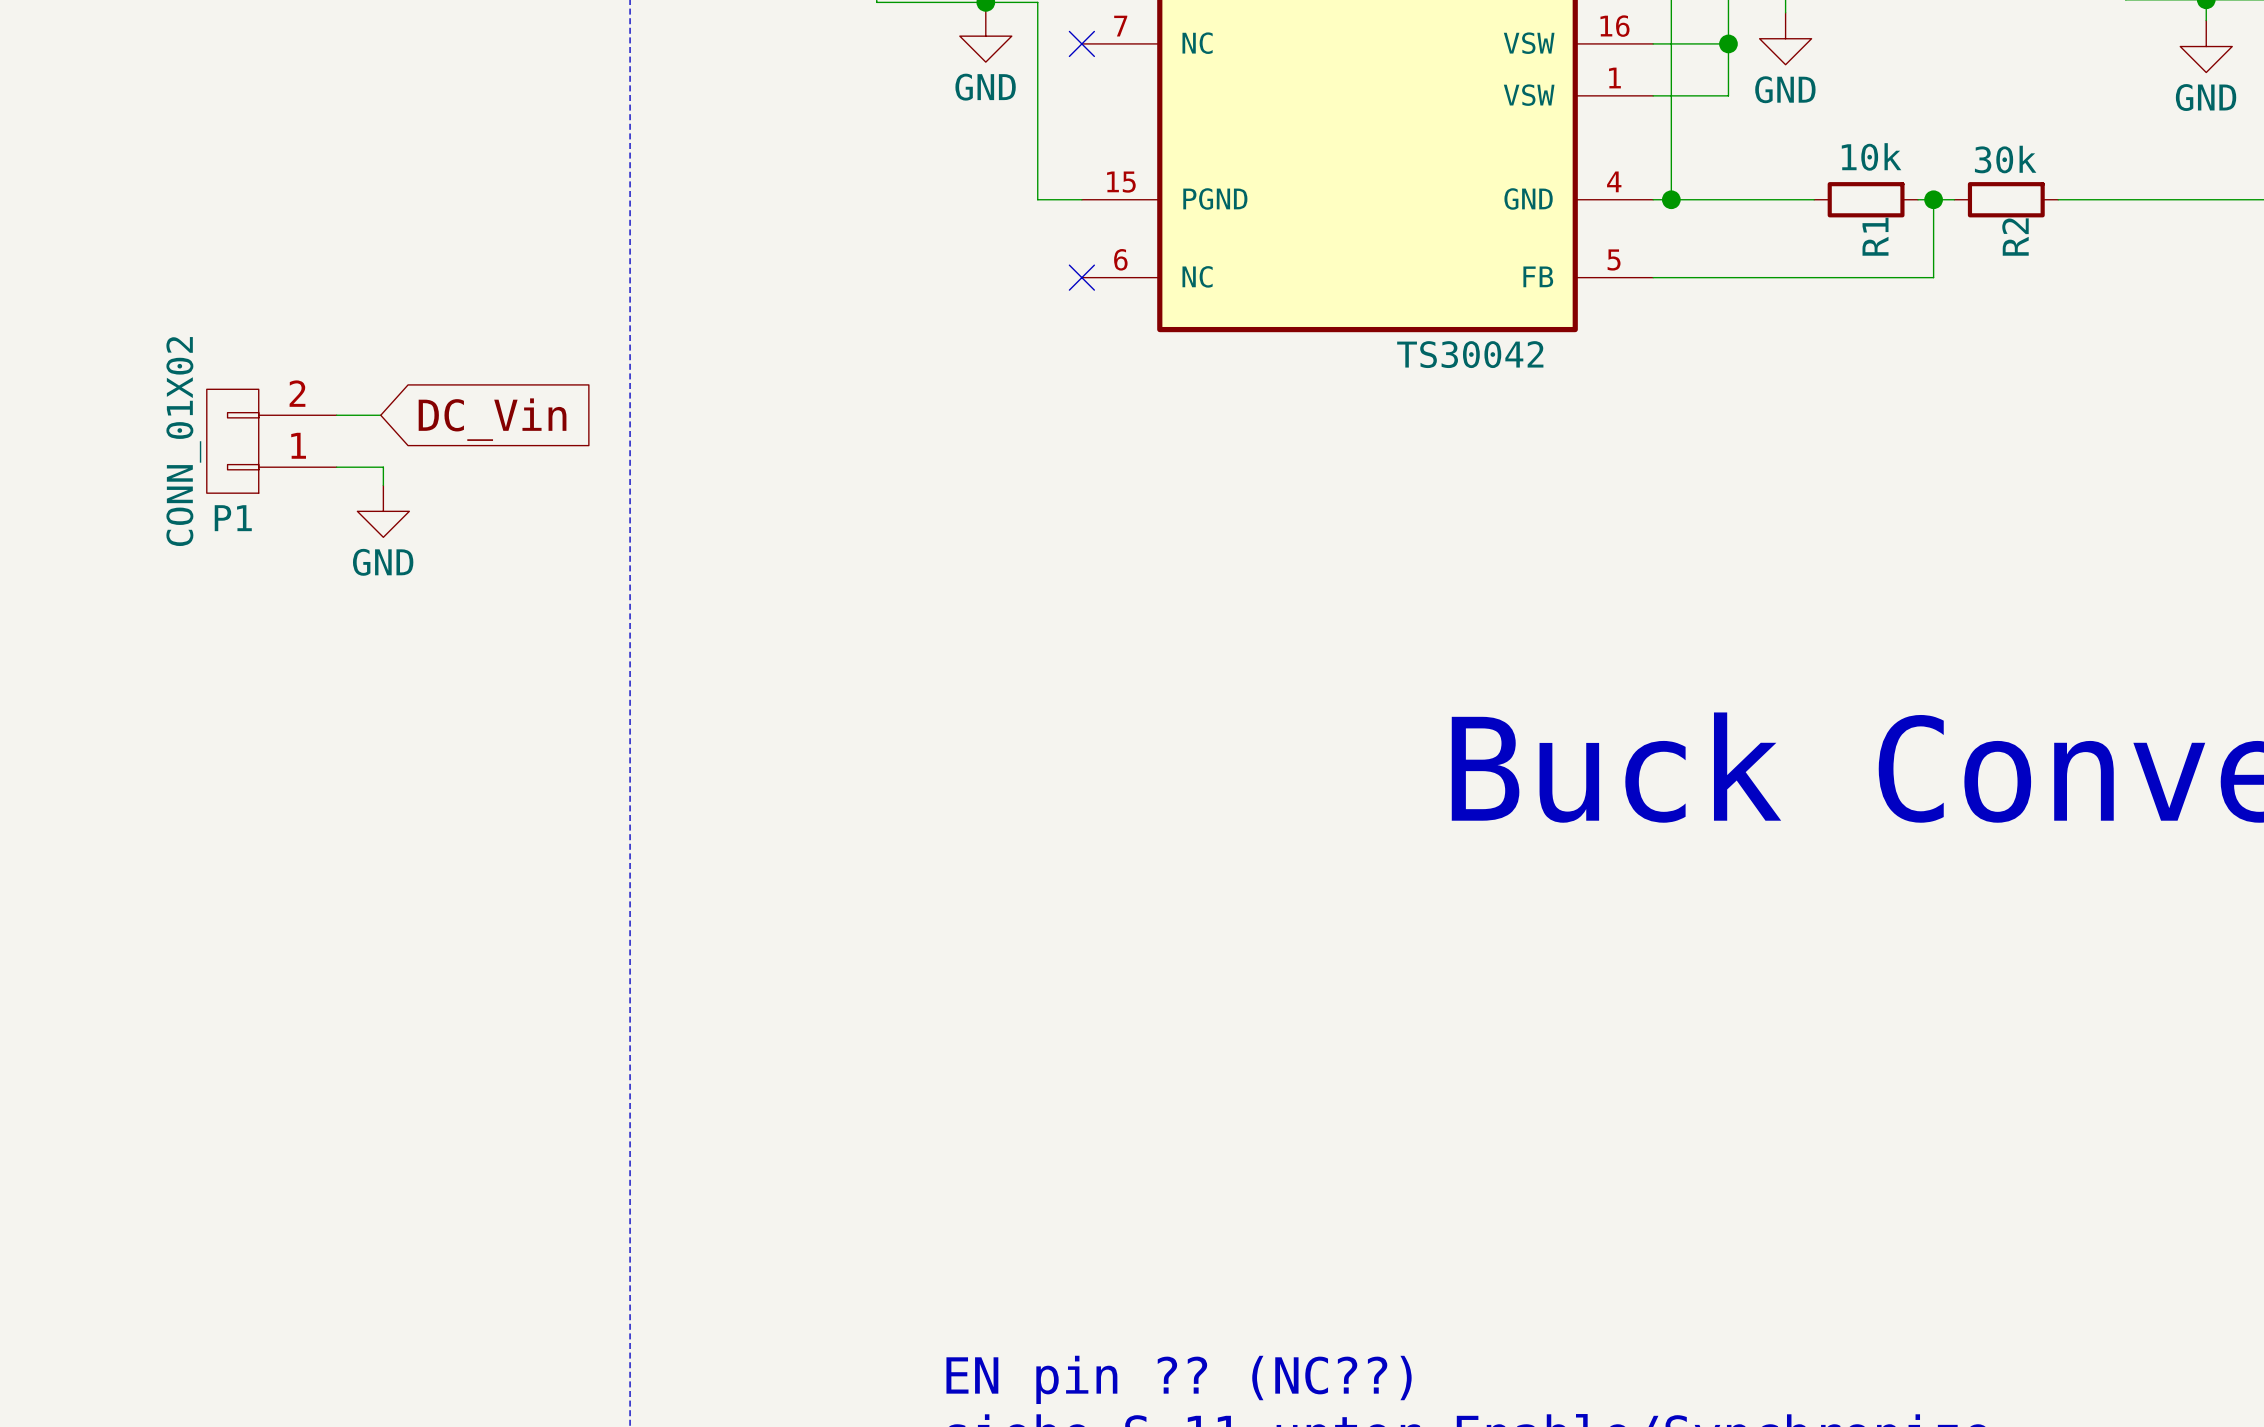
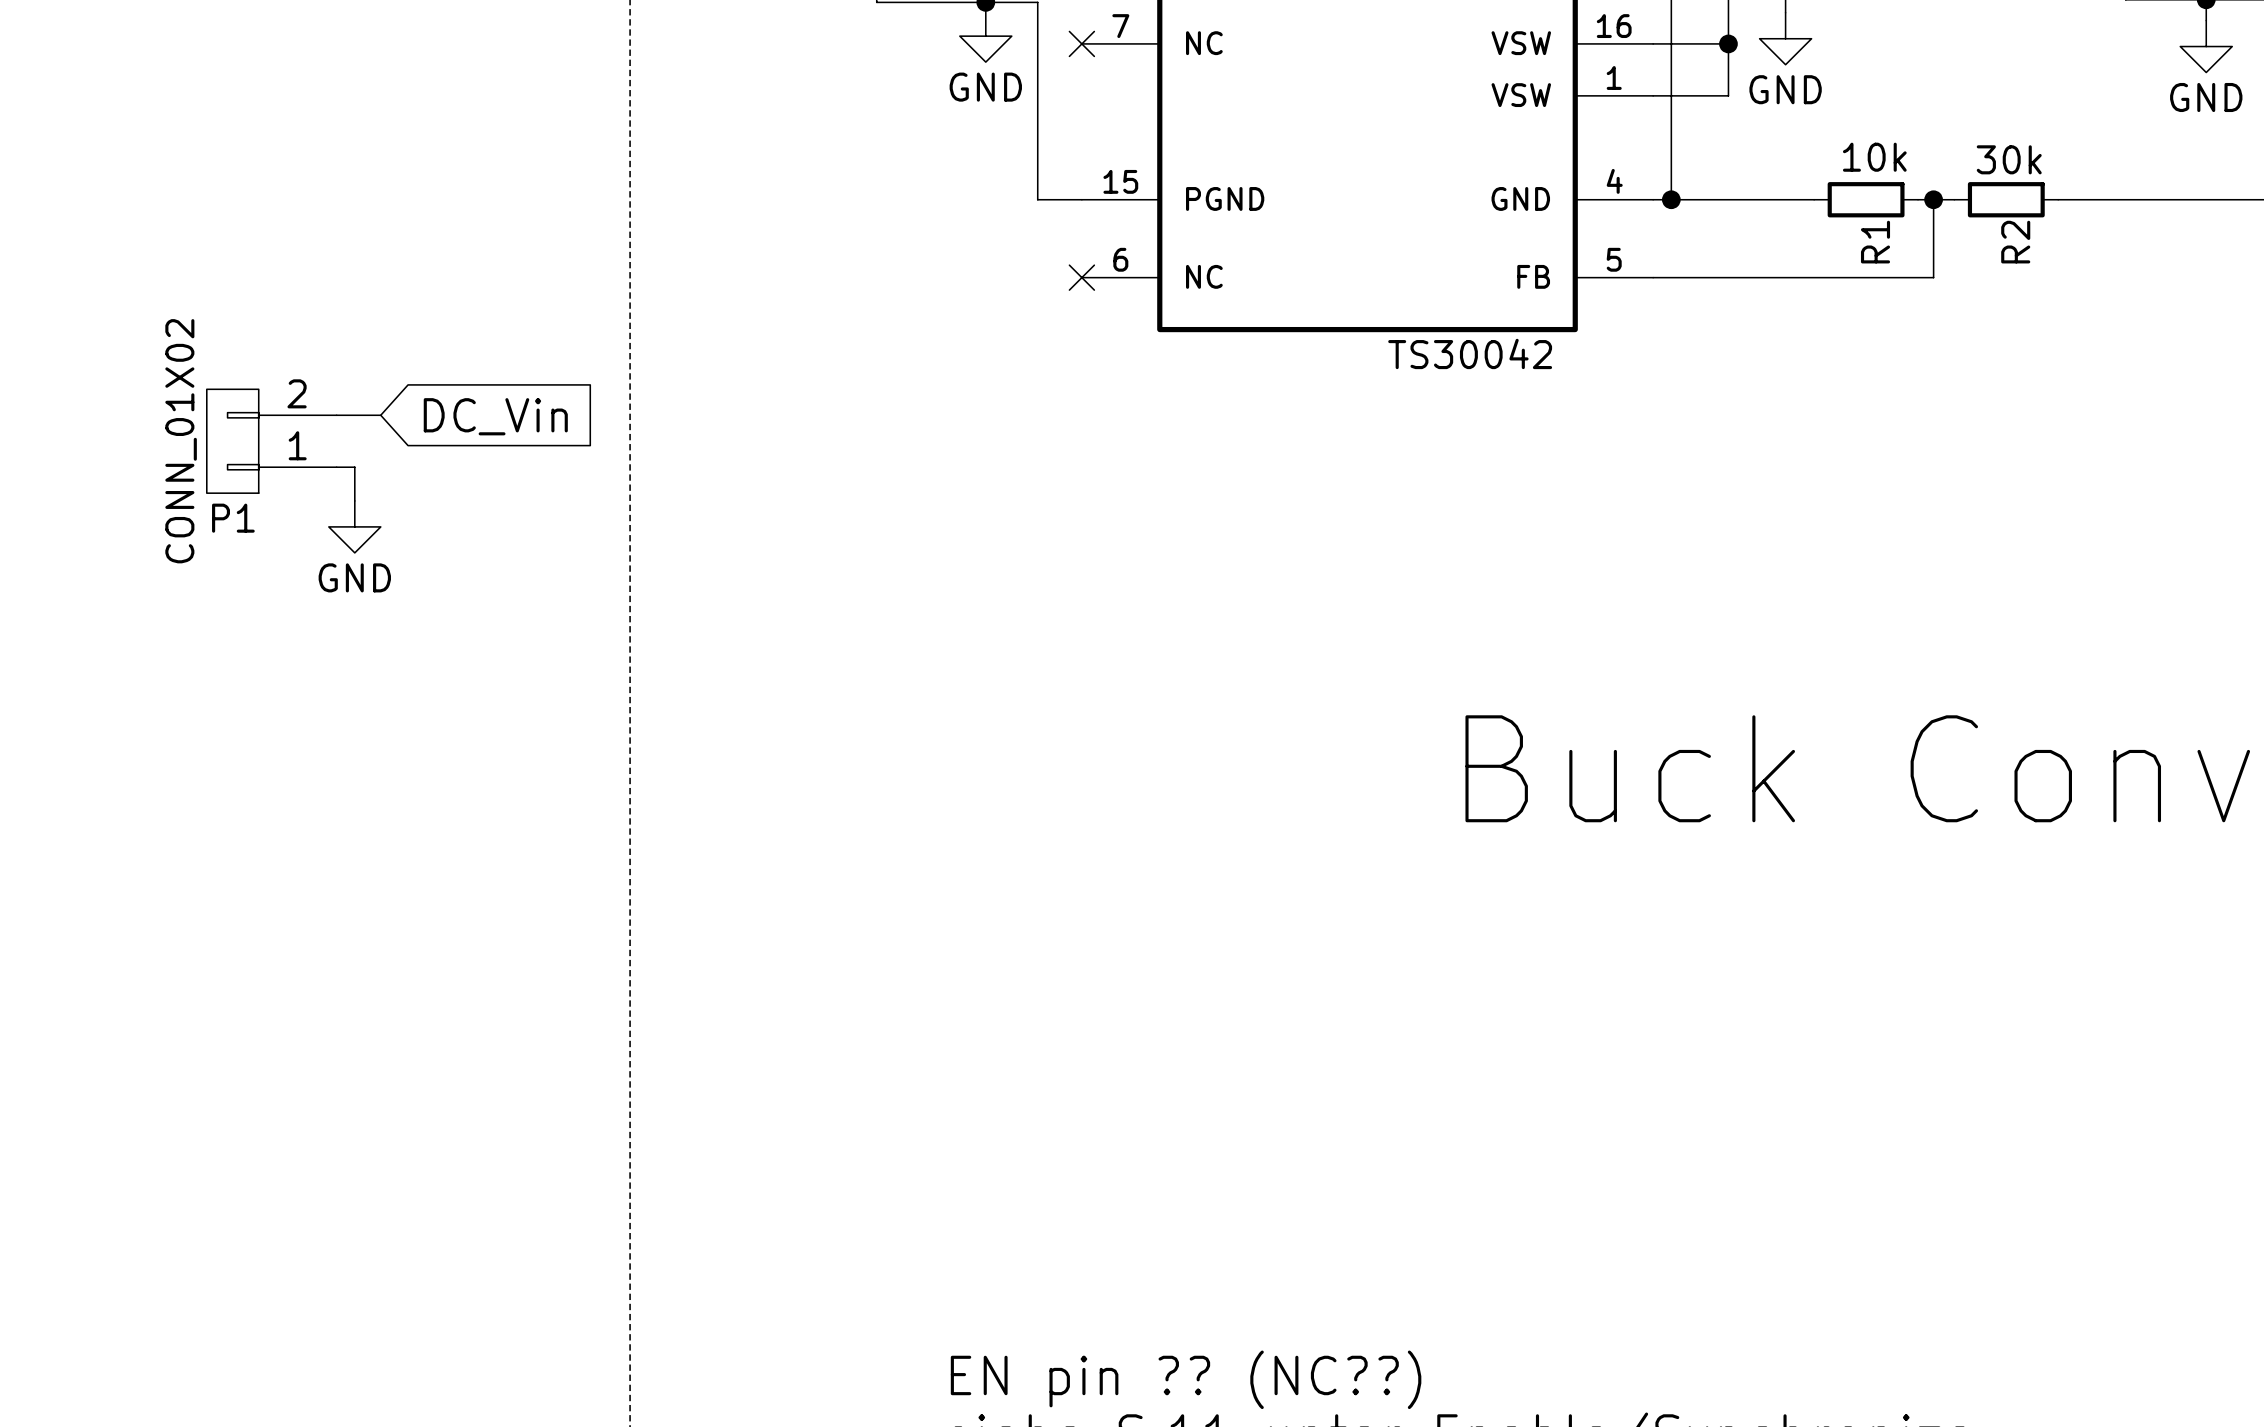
wire: (354, 467) (383, 467) (383, 485) -> (354, 467) (354, 500)
power symbol position: GND (383, 511) -> GND (354, 526)

